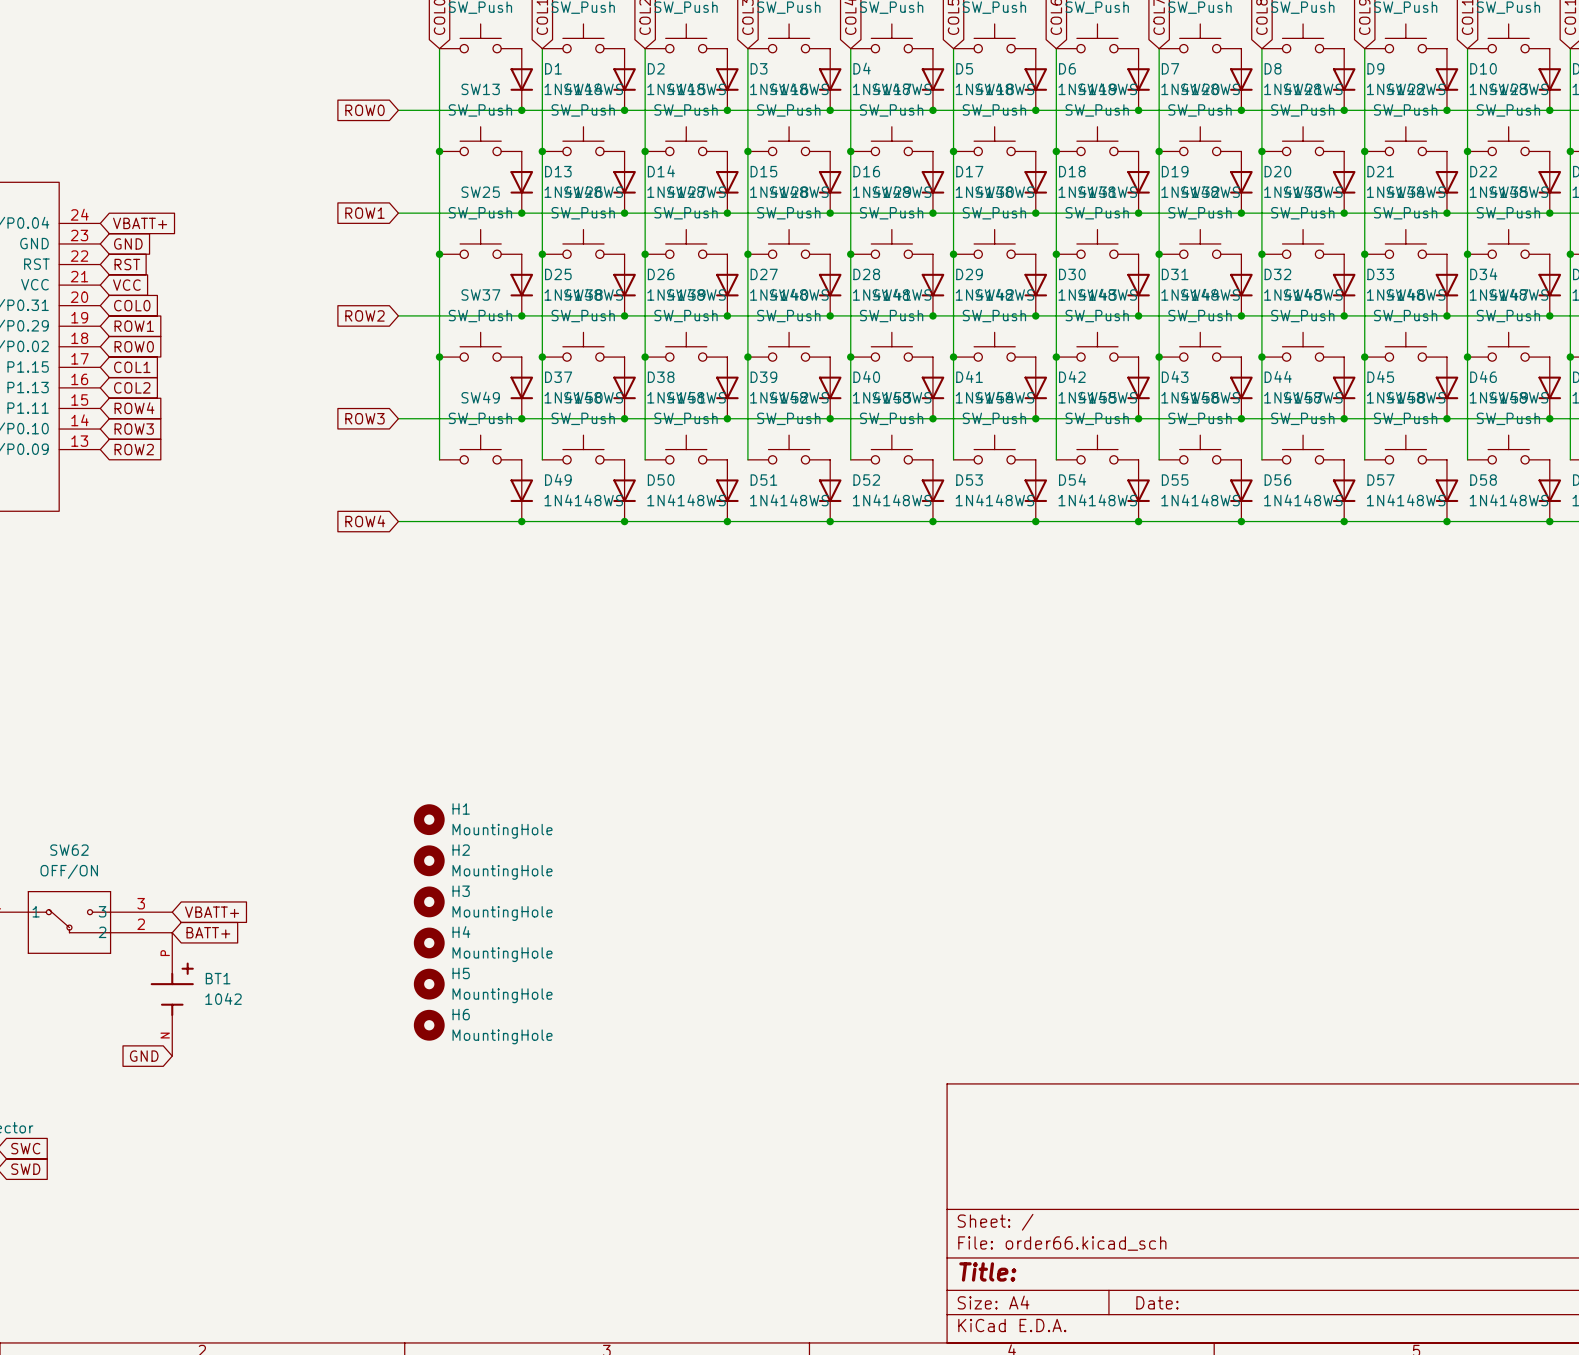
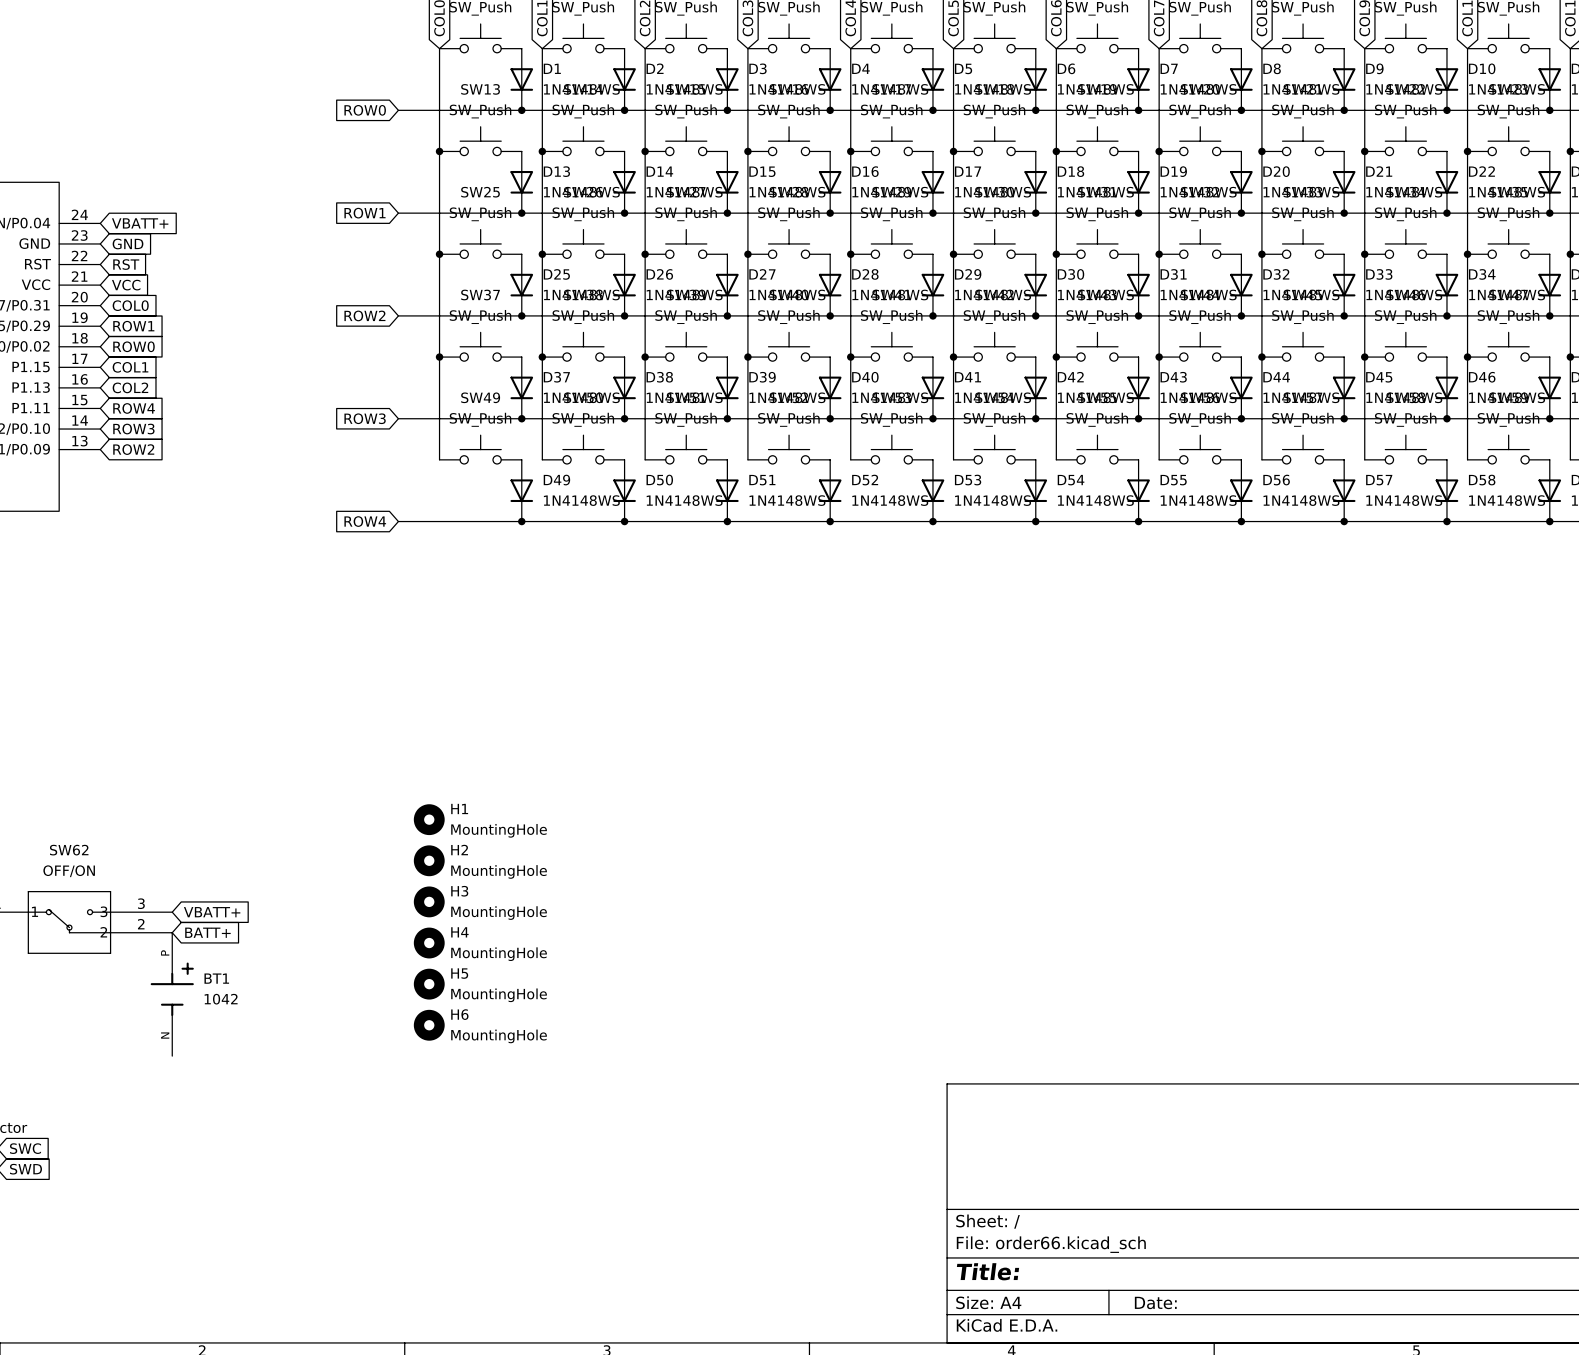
global label: GND (144, 1056) -> none

